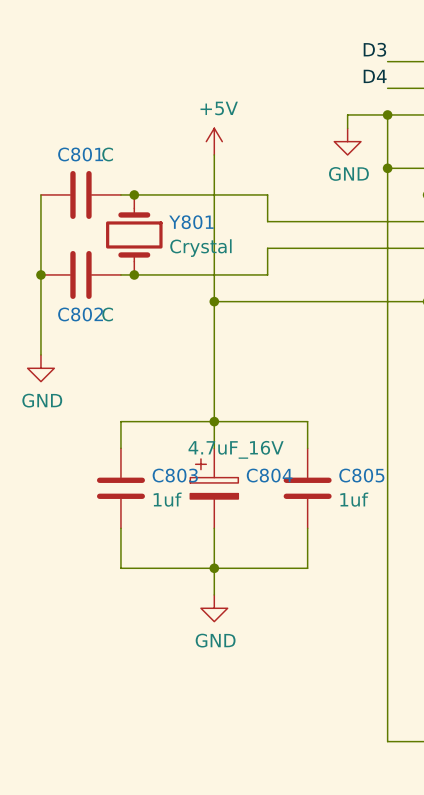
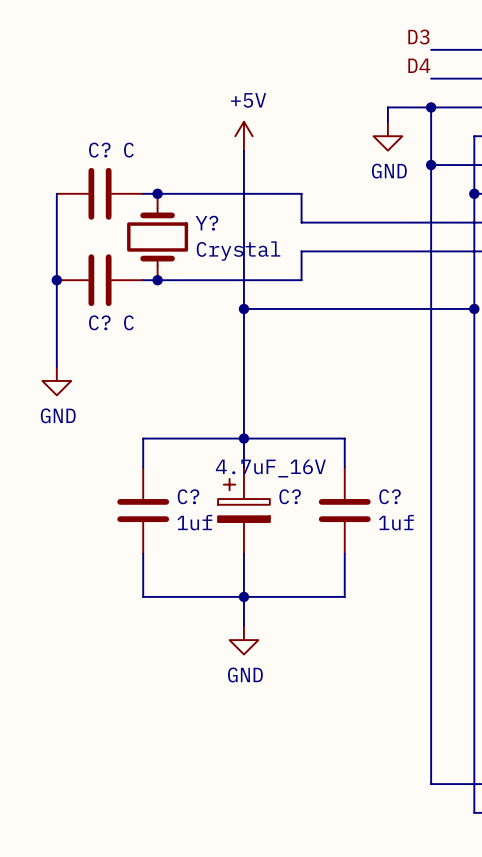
C801 name: C801 (80, 154) -> C? (99, 150)
Y801 name: Y801 (191, 222) -> Y? (206, 223)
C802 name: C802 (80, 314) -> C? (99, 322)
C803 name: C803 (175, 475) -> C? (188, 496)
C804 name: C804 (269, 475) -> C? (290, 496)
C805 name: C805 (361, 475) -> C? (390, 496)

